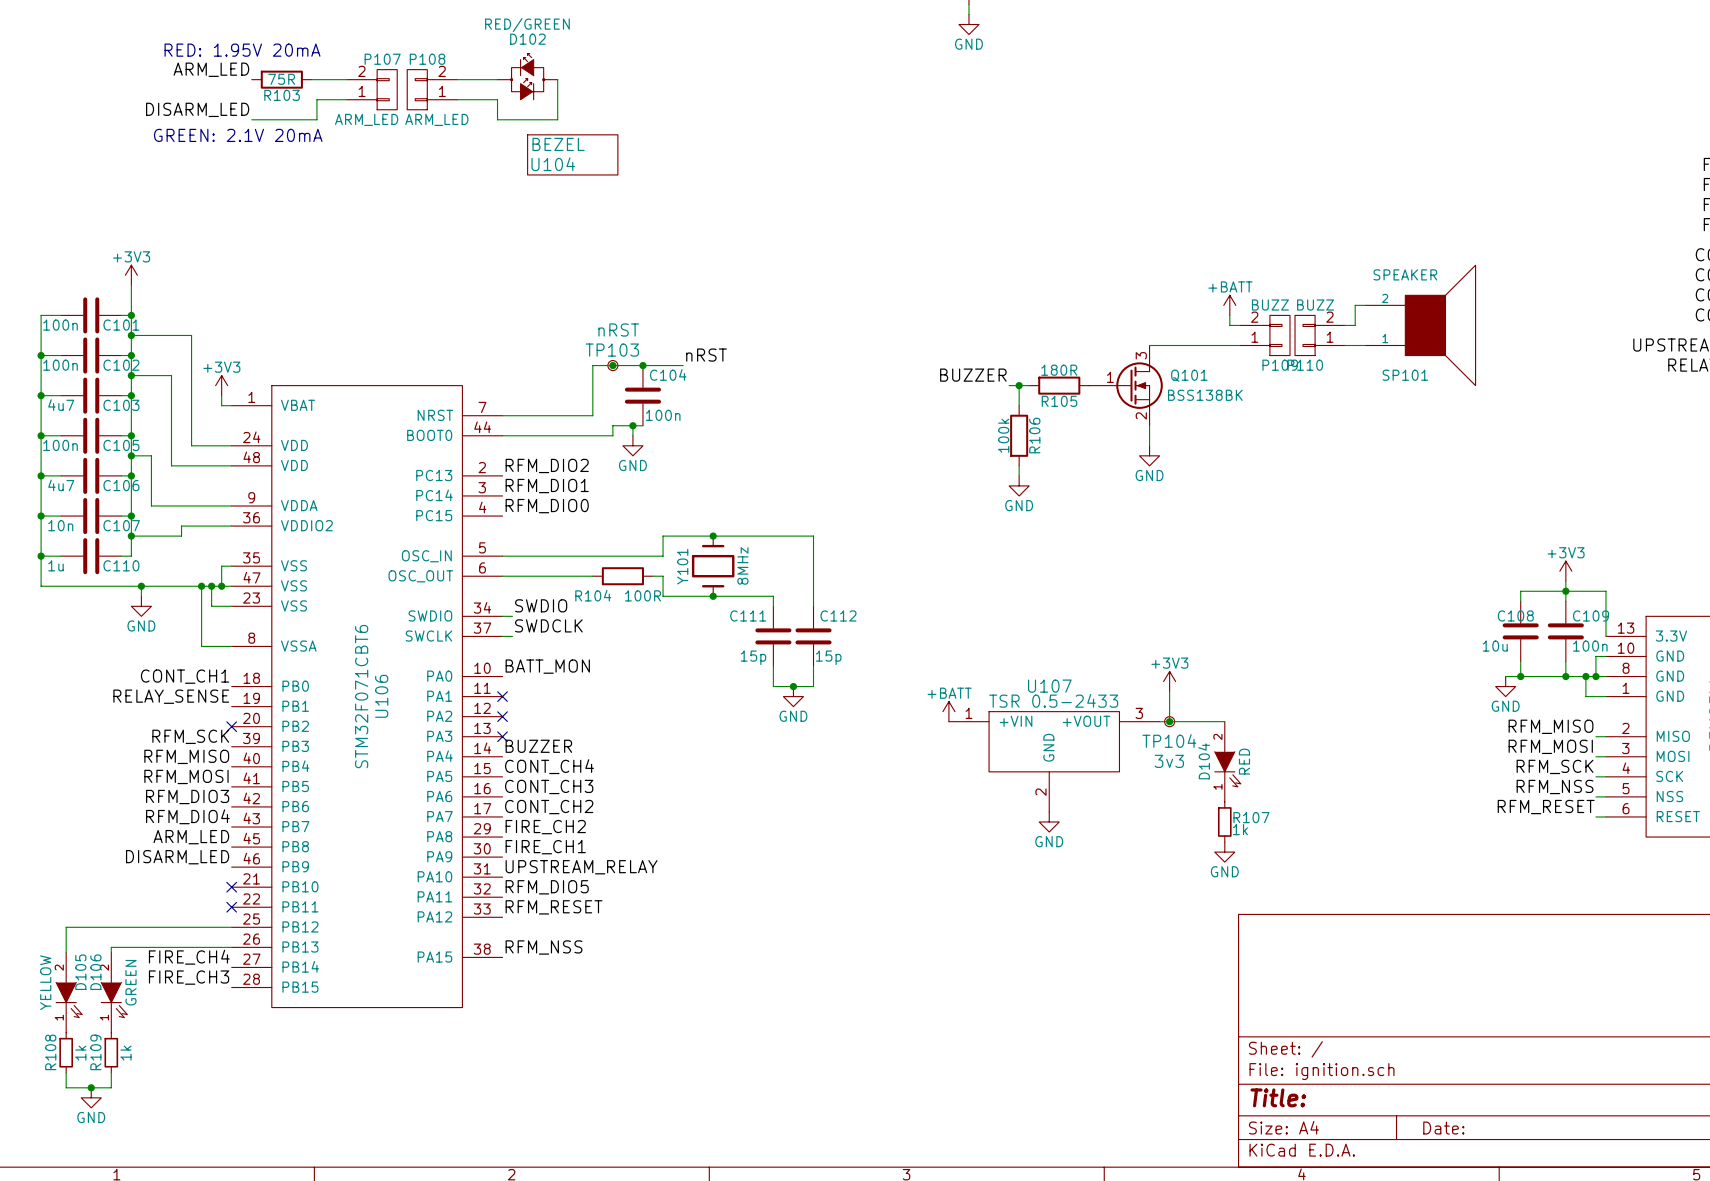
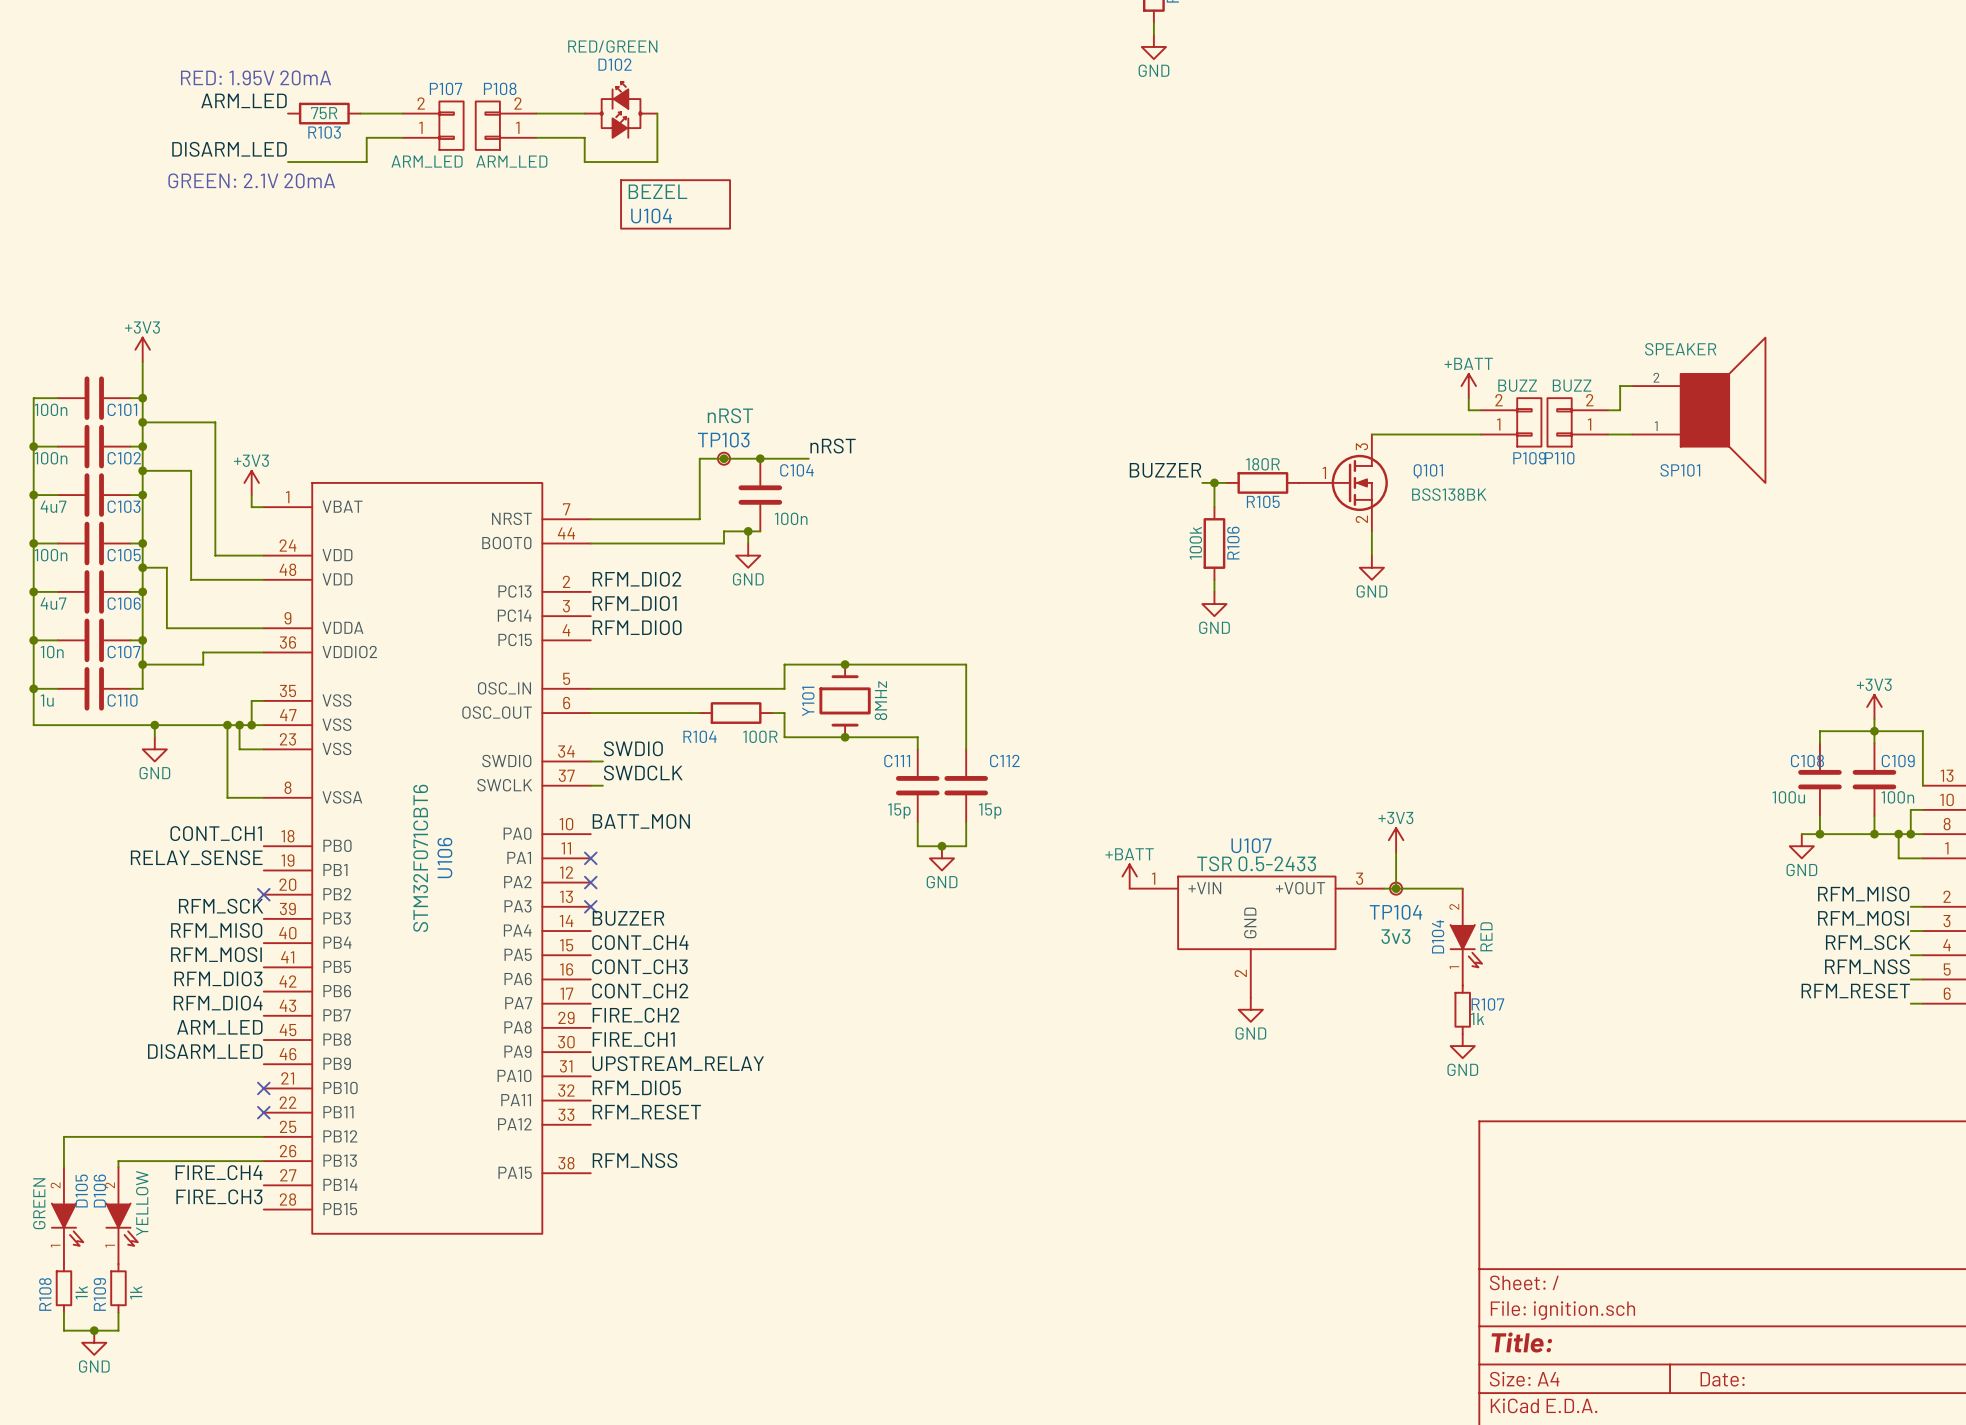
C108 value: 10u (1495, 646) -> 100u (1788, 797)
D105 value: YELLOW (45, 982) -> GREEN (39, 1203)
D106 value: GREEN (131, 982) -> YELLOW (142, 1203)

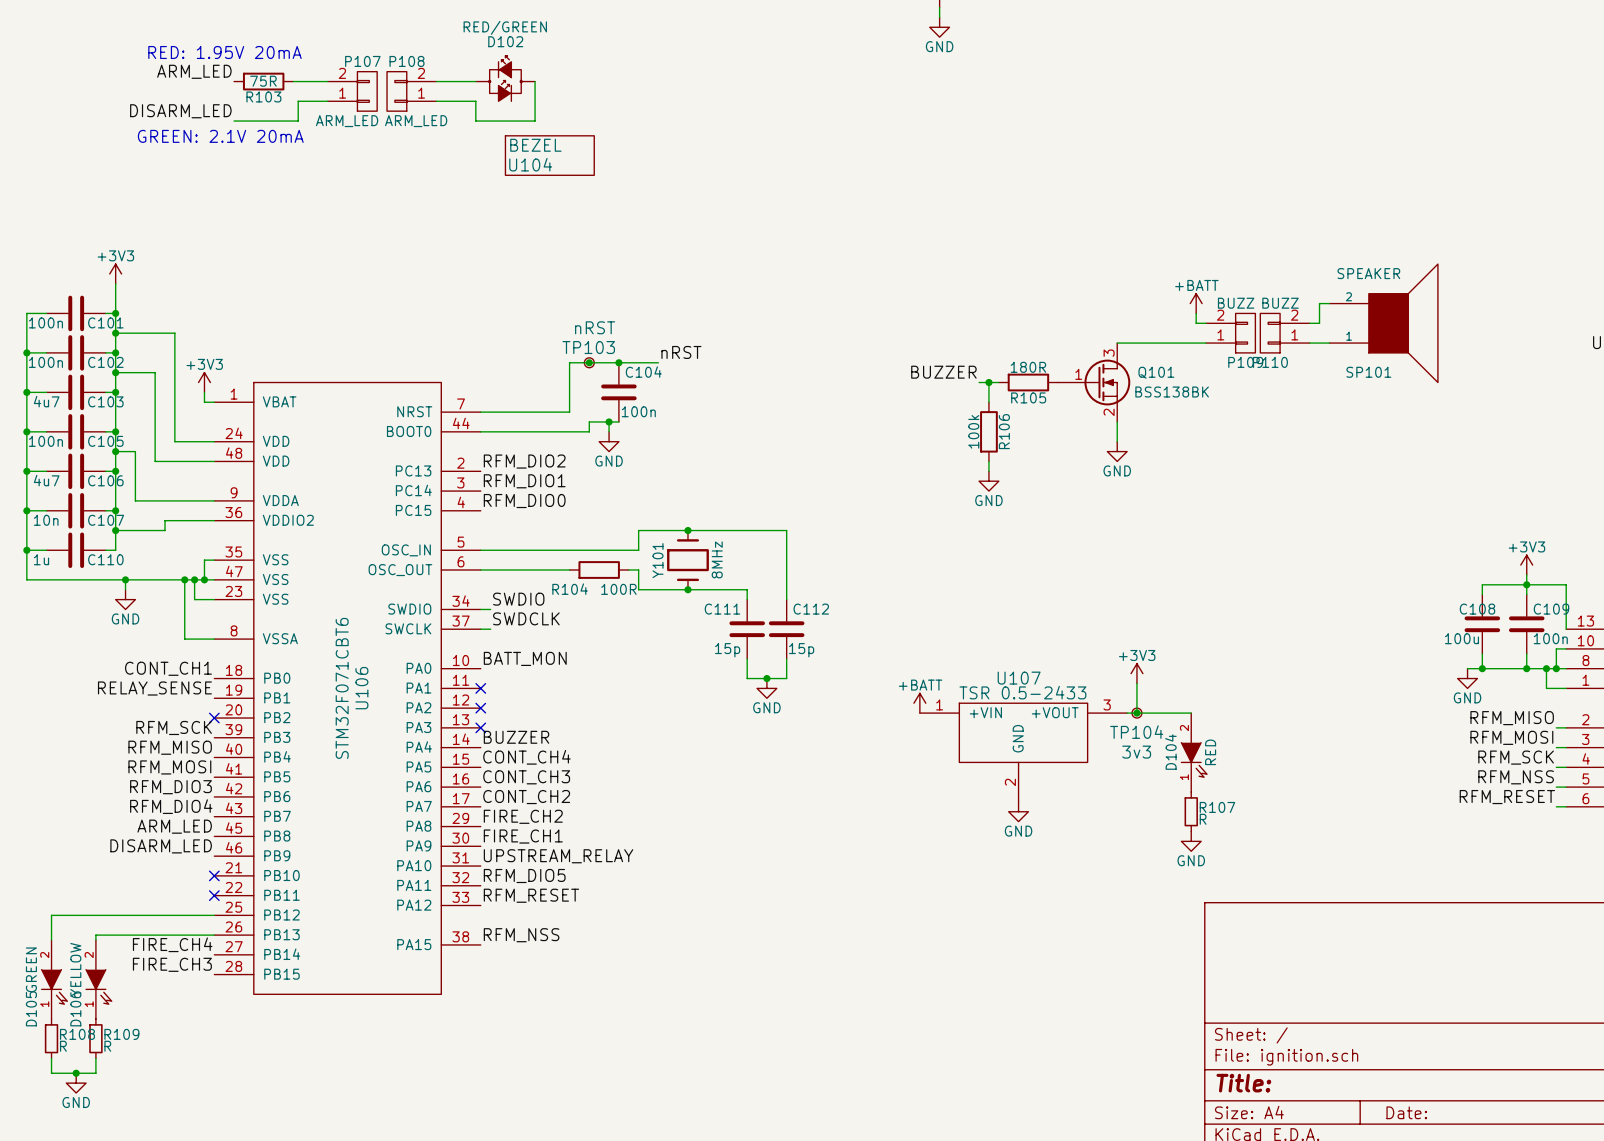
R107 value: 1k (1477, 1018) -> R (1203, 819)
D105 name position: D105 (81, 1191) -> D105 (31, 1008)
D106 name position: D106 (99, 1191) -> D106 (75, 1008)
D106 value position: YELLOW (142, 1203) -> YELLOW (75, 969)
R108 value: 1k (81, 1292) -> R (63, 1046)
R109 value: 1k (136, 1292) -> R (107, 1046)
R108 name rotation: 0° (45, 1294) -> 90° clockwise (77, 1034)
R109 name rotation: 0° (99, 1294) -> 90° clockwise (121, 1034)

